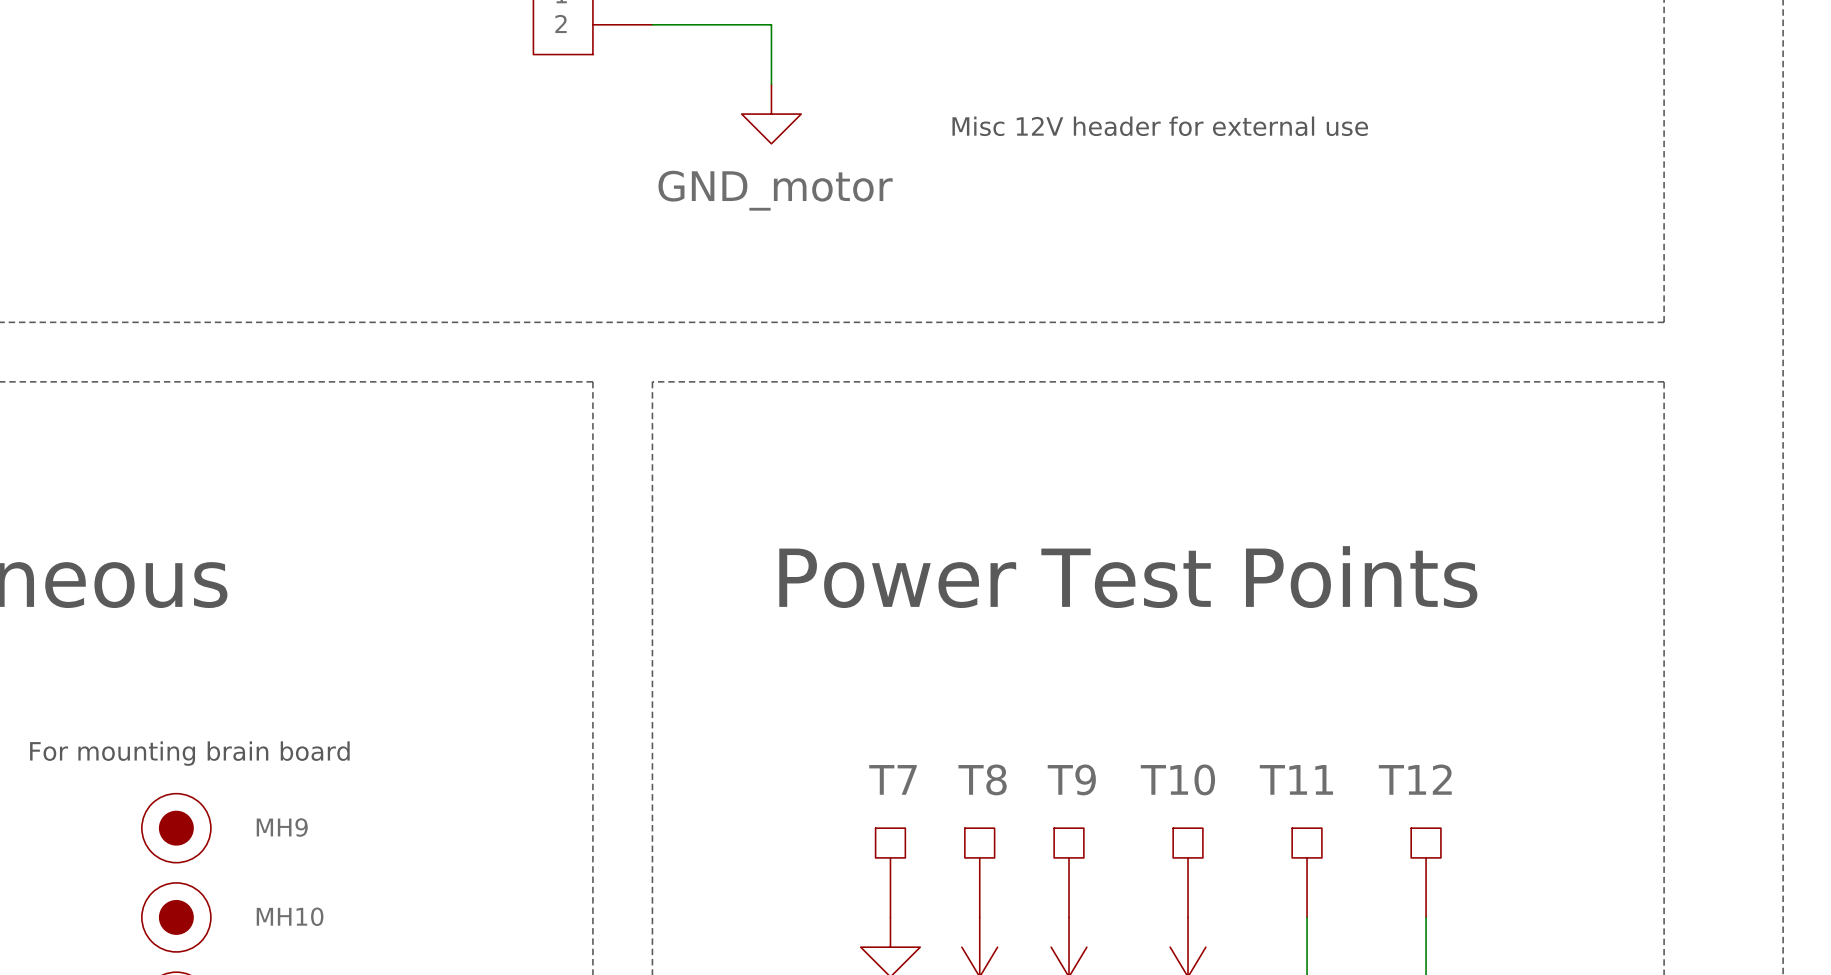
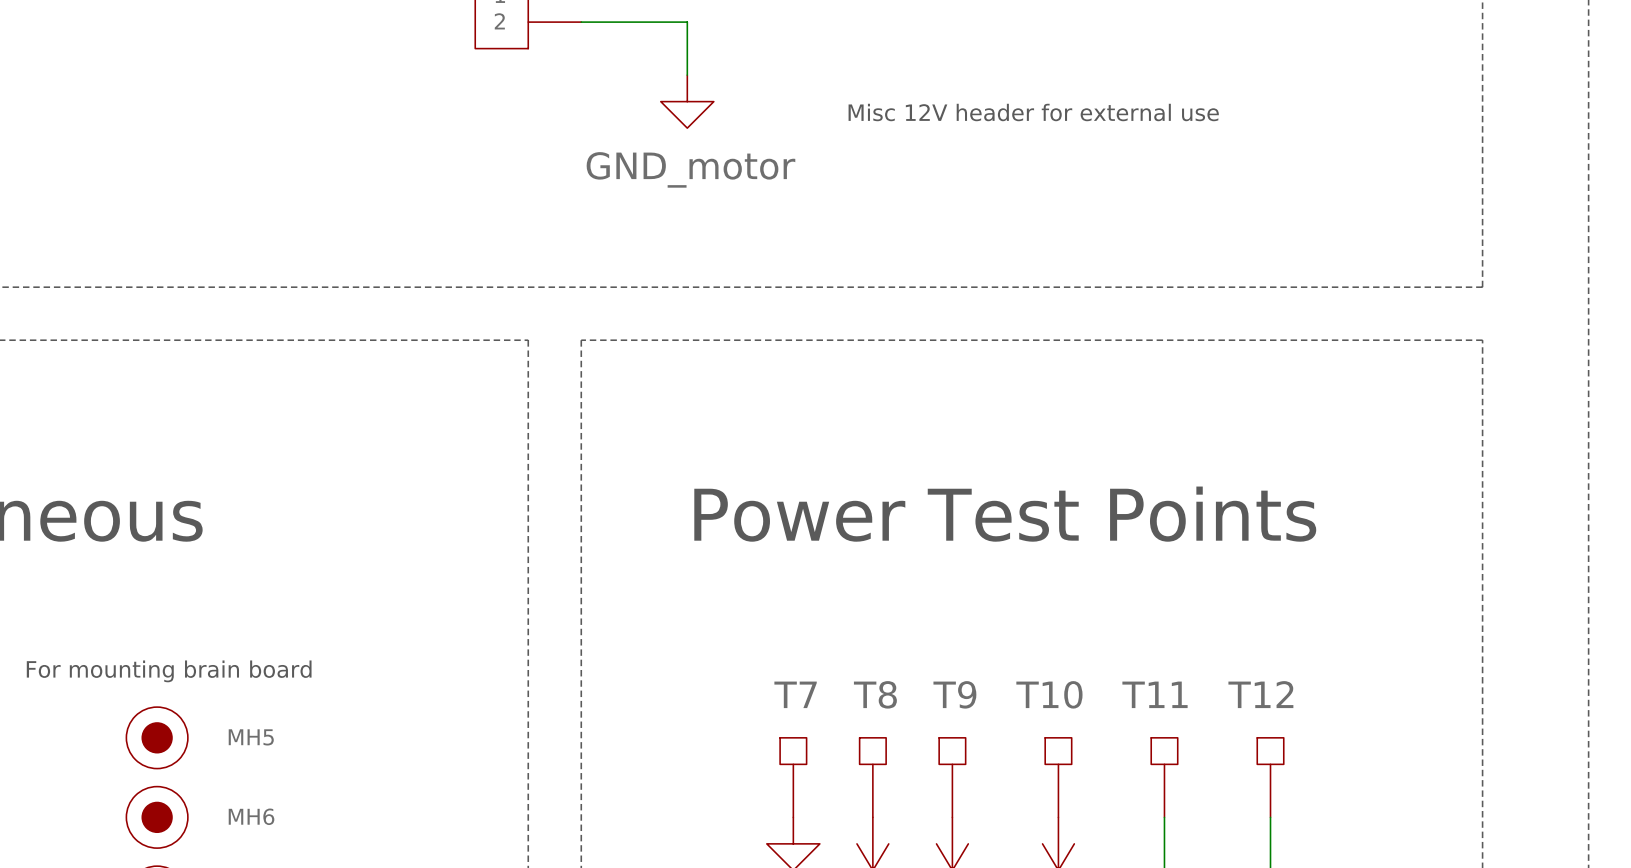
MH9 name: MH9 (282, 827) -> MH5 (251, 737)
MH10 name: MH10 (290, 916) -> MH6 (251, 816)

